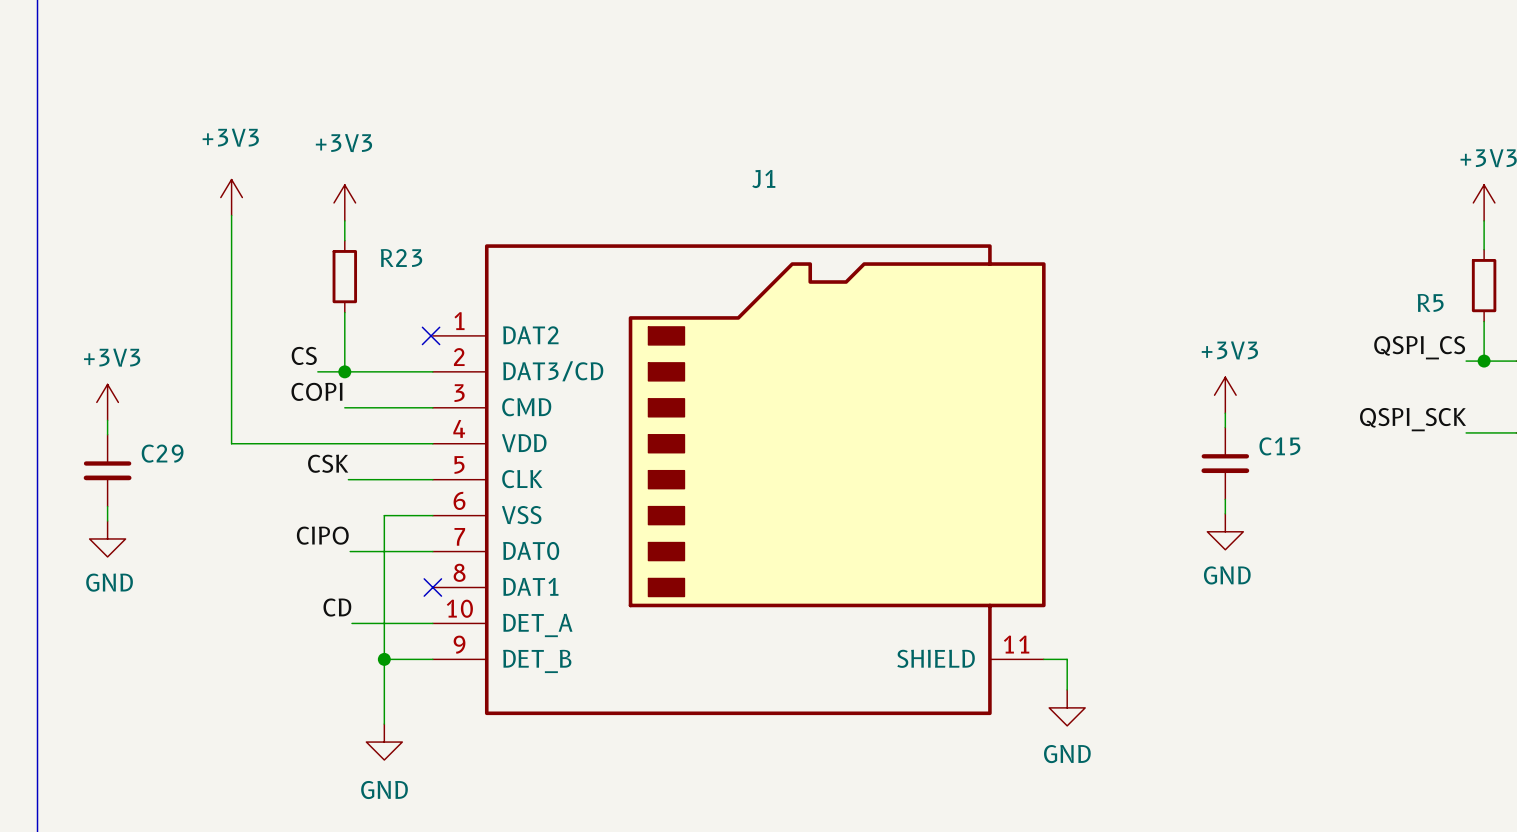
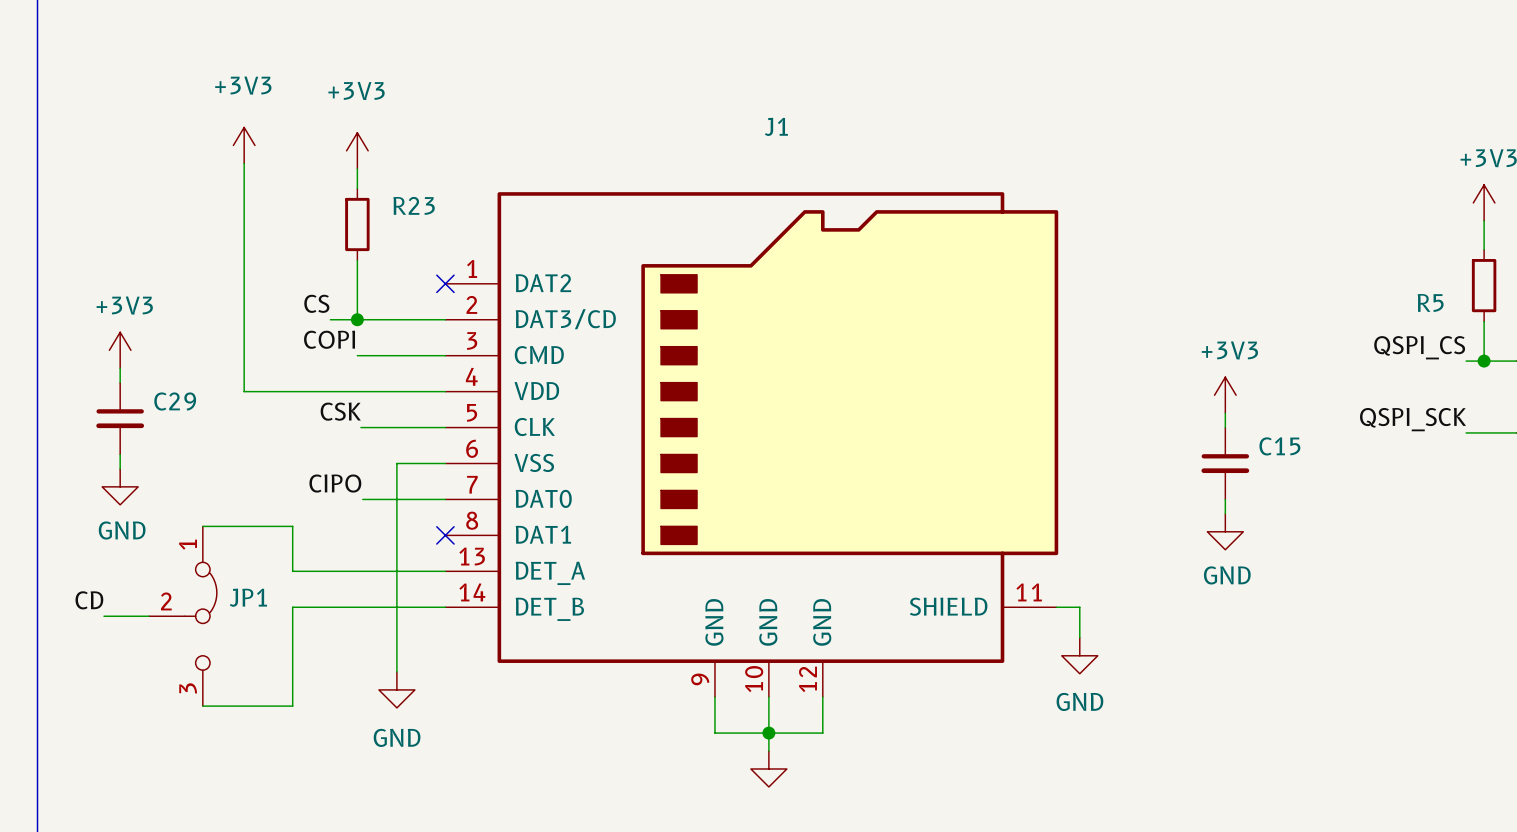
power symbol position: +3V3 (231, 197) -> +3V3 (244, 145)
power symbol position: +3V3 (344, 202) -> +3V3 (357, 150)
wire: (231, 215) (231, 443) (432, 443) -> (244, 163) (244, 391) (445, 391)
wire: (344, 220) (344, 240) -> (357, 168) (357, 188)
J1 symbol: [432, 244, 1046, 716] -> [445, 192, 1059, 698]
R23 position: (344, 276) -> (357, 224)
wire: (344, 312) (344, 371) -> (357, 260) (357, 319)
no-connect mark position: (431, 335) -> (445, 283)
label position: CS (304, 355) -> CS (316, 303)
wire: (317, 371) (432, 371) -> (330, 319) (445, 319)
junction position: (344, 371) -> (357, 319)
label position: COPI (316, 391) -> COPI (329, 339)
power symbol position: +3V3 (107, 402) -> +3V3 (120, 350)
wire: (344, 407) (432, 407) -> (357, 355) (445, 355)
wire: (107, 420) (107, 434) -> (120, 368) (120, 382)
label position: CSK (328, 463) -> CSK (340, 411)
C29 position: (107, 470) -> (120, 418)
wire: (348, 479) (432, 479) -> (360, 427) (445, 427)
wire: (107, 506) (107, 521) -> (120, 454) (120, 468)
wire: (432, 515) (384, 515) (384, 724) -> (445, 463) (396, 463) (396, 671)
wire: none -> (202, 526) (292, 526) (292, 571) (445, 571)
label position: CIPO (322, 535) -> CIPO (335, 483)
power symbol position: GND (107, 538) -> GND (120, 486)
wire: (350, 551) (432, 551) -> (362, 499) (445, 499)
no-connect mark position: (432, 587) -> (445, 535)
label position: CD (337, 607) -> CD (89, 600)
wire: none -> (445, 607) (292, 607) (292, 706) (202, 706)
wire: none -> (104, 616) (148, 616)
JP1: none -> (182, 616)
wire: (351, 623) (432, 623) -> none
wire: (384, 659) (432, 659) -> none
junction: (384, 659) -> none
wire: (1043, 659) (1067, 659) (1067, 689) -> (1056, 607) (1079, 607) (1079, 637)
wire: none -> (714, 697) (714, 733) (822, 733) (822, 697)
wire: none -> (768, 697) (768, 751)
power symbol position: GND (1067, 707) -> GND (1079, 655)
junction: none -> (768, 733)
power symbol position: GND (384, 742) -> GND (396, 689)
power symbol: none -> (768, 769)

